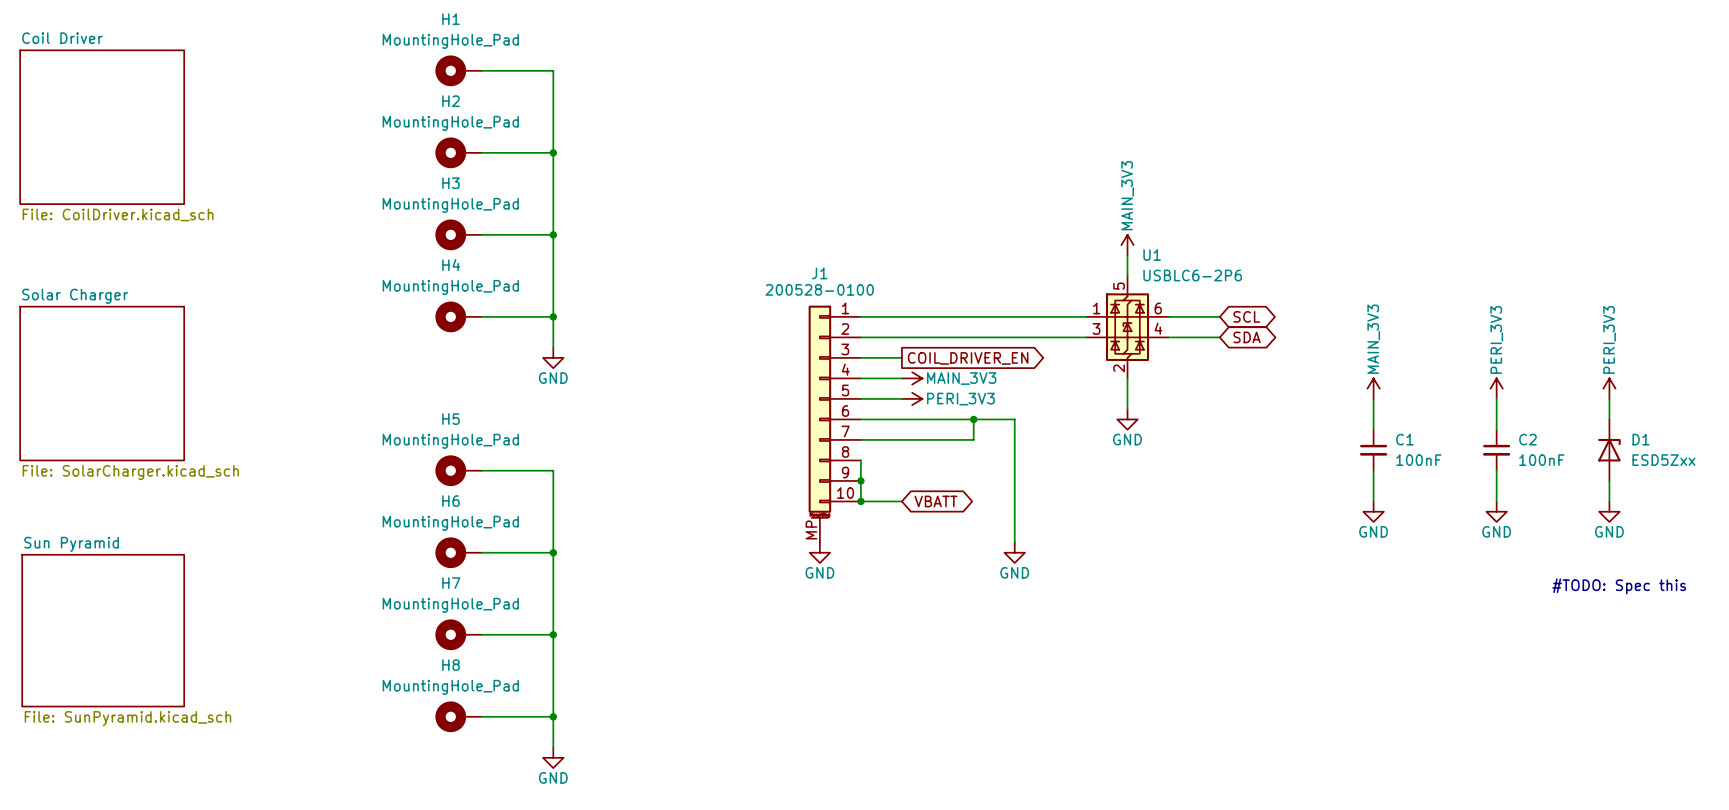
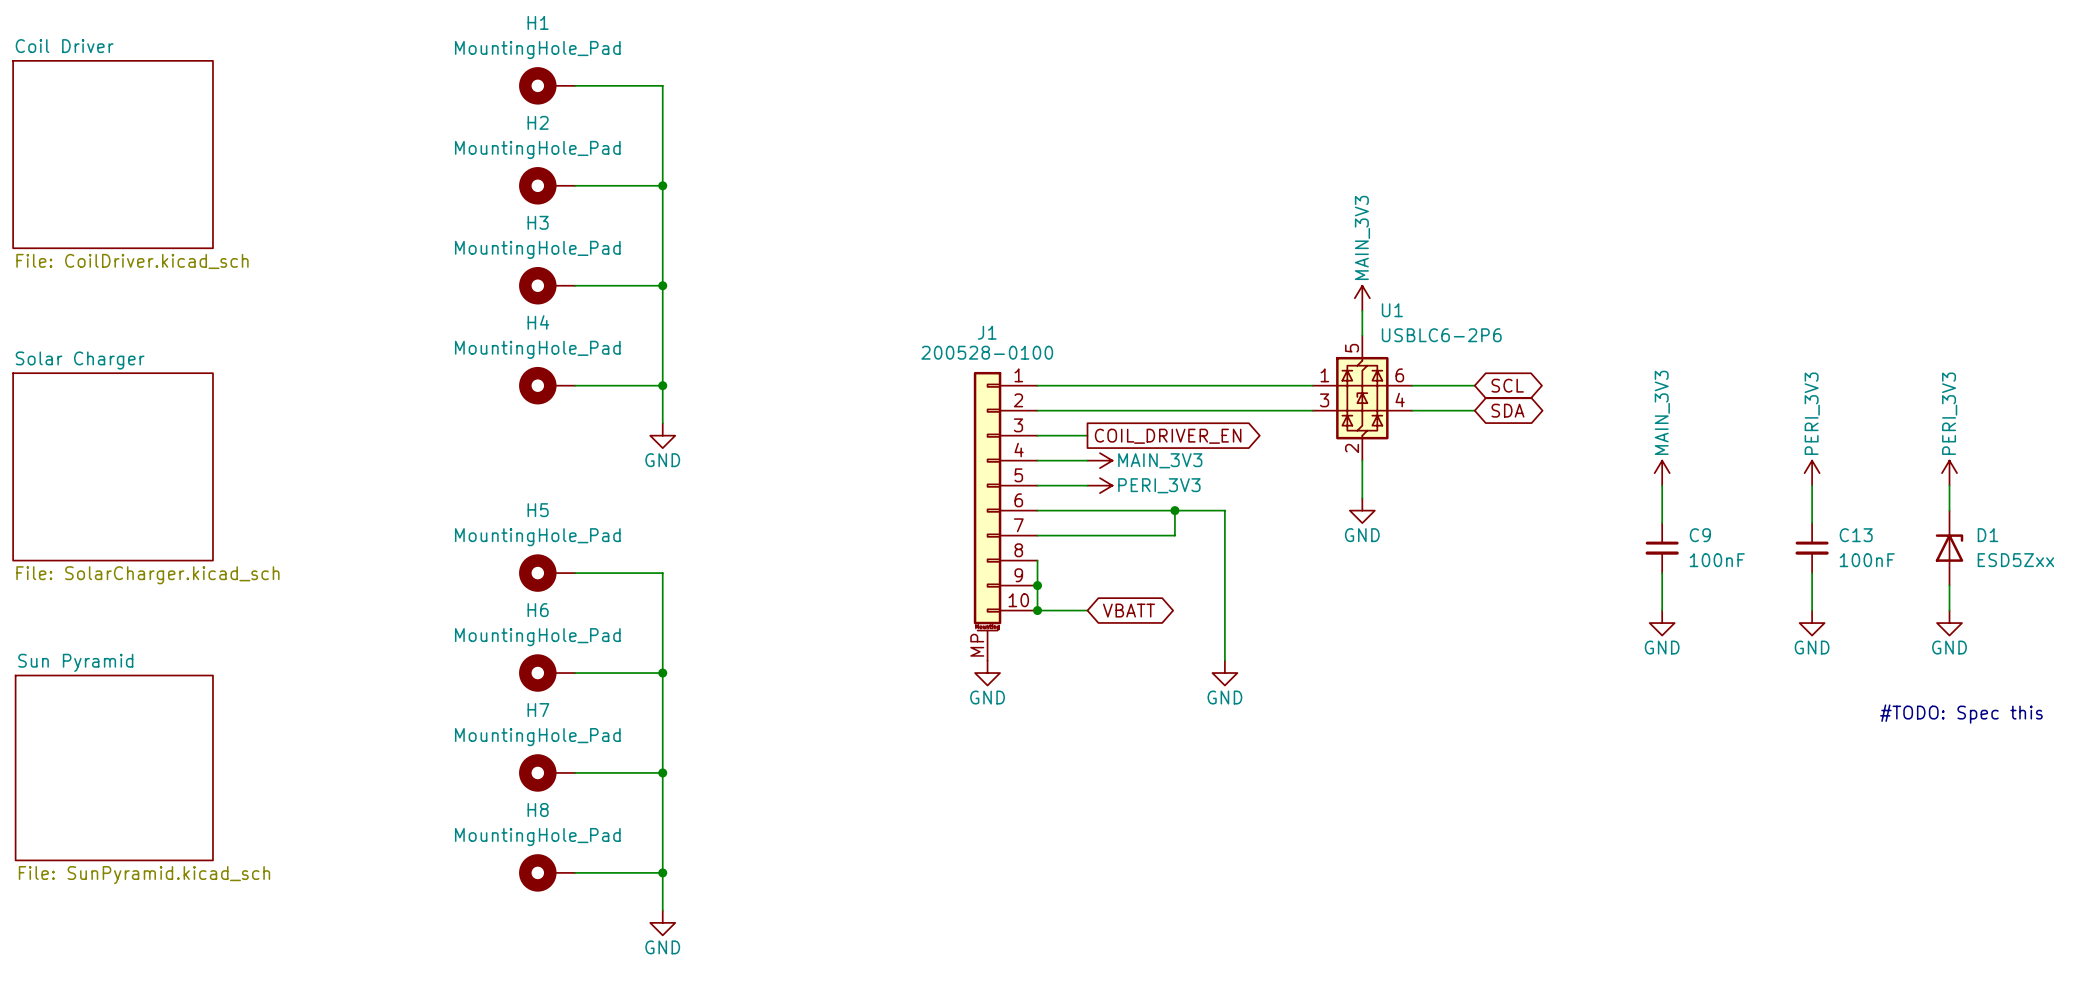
C1 name: C1 (1404, 439) -> C9 (1700, 535)
C2 name: C2 (1527, 439) -> C13 (1856, 535)

